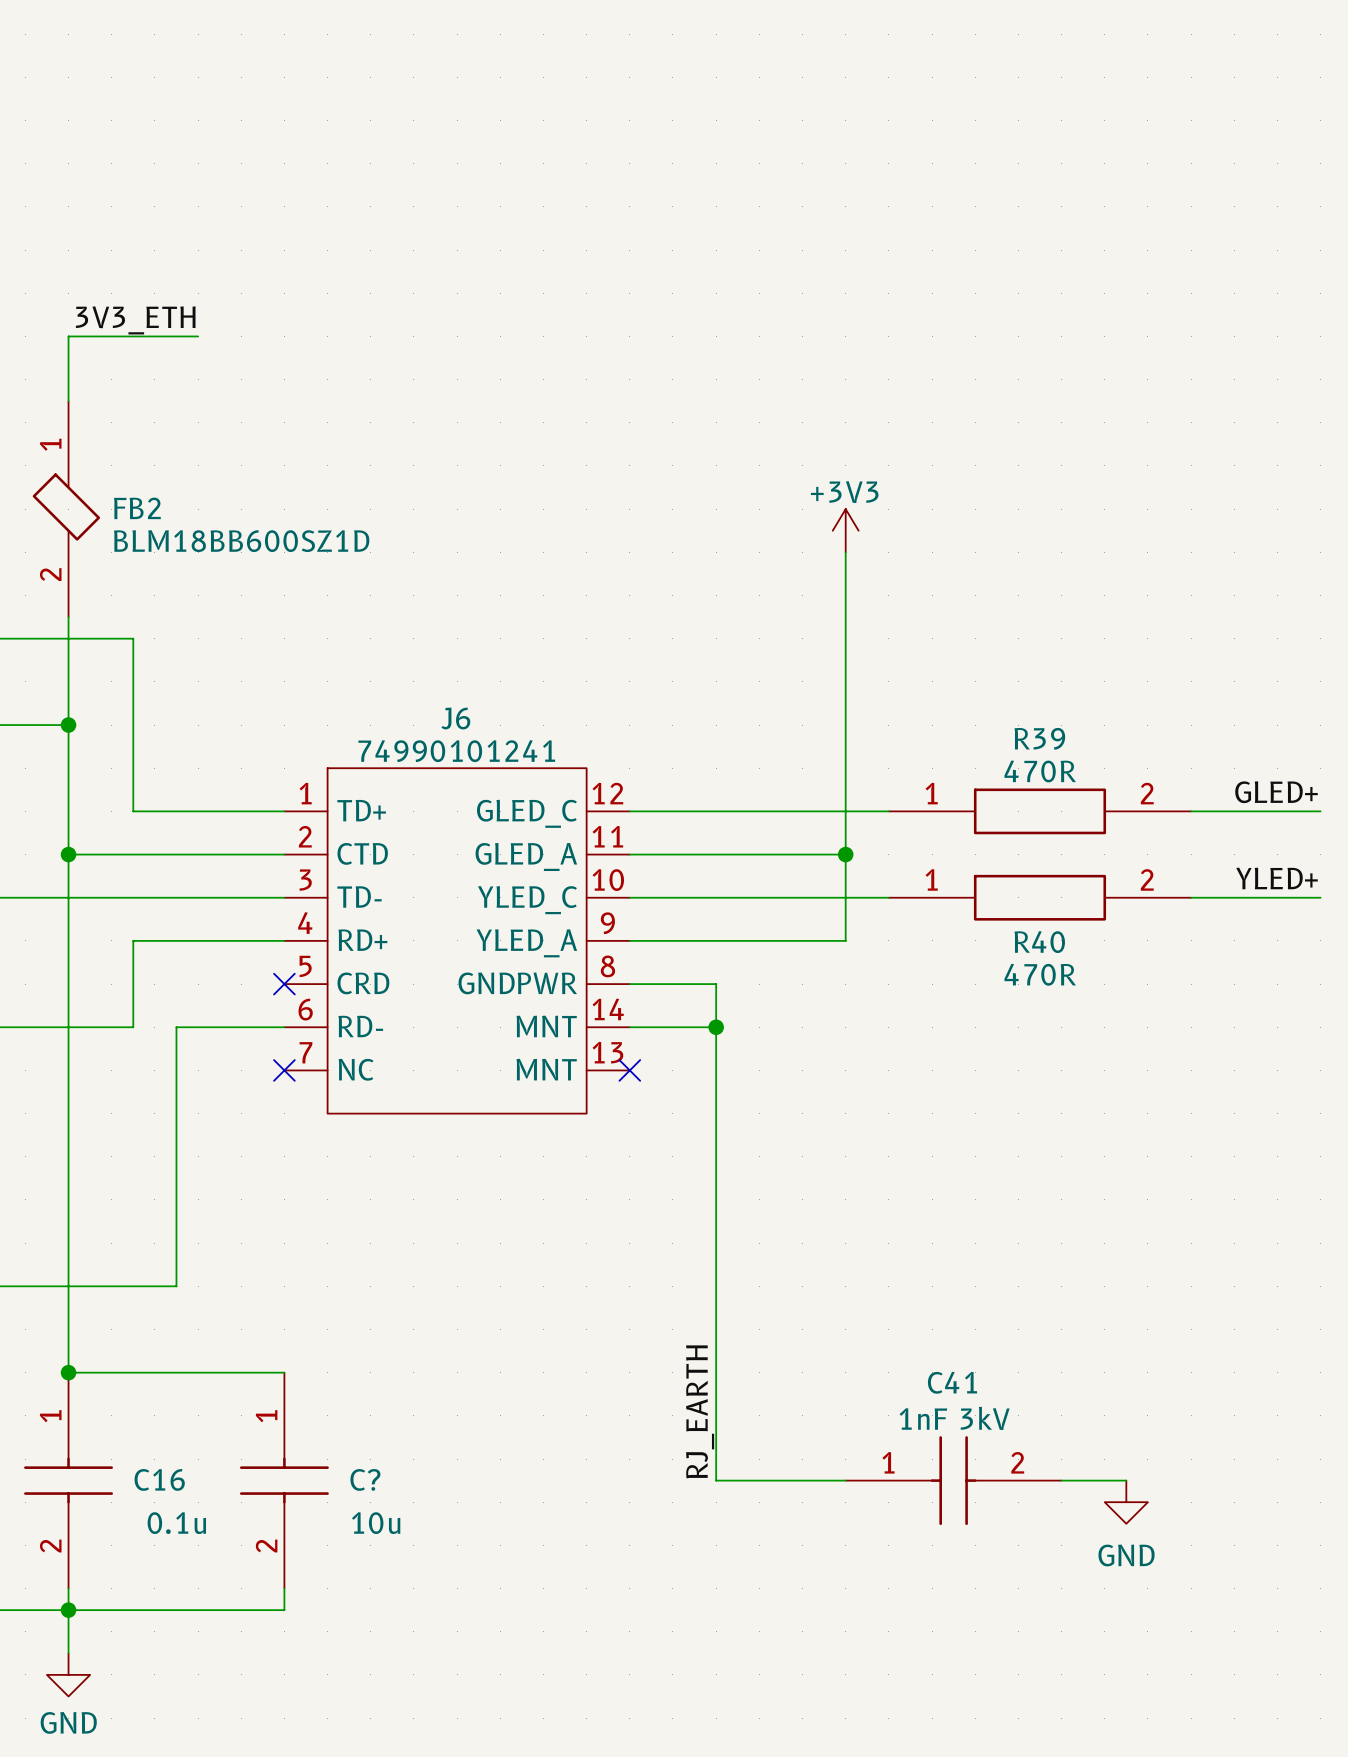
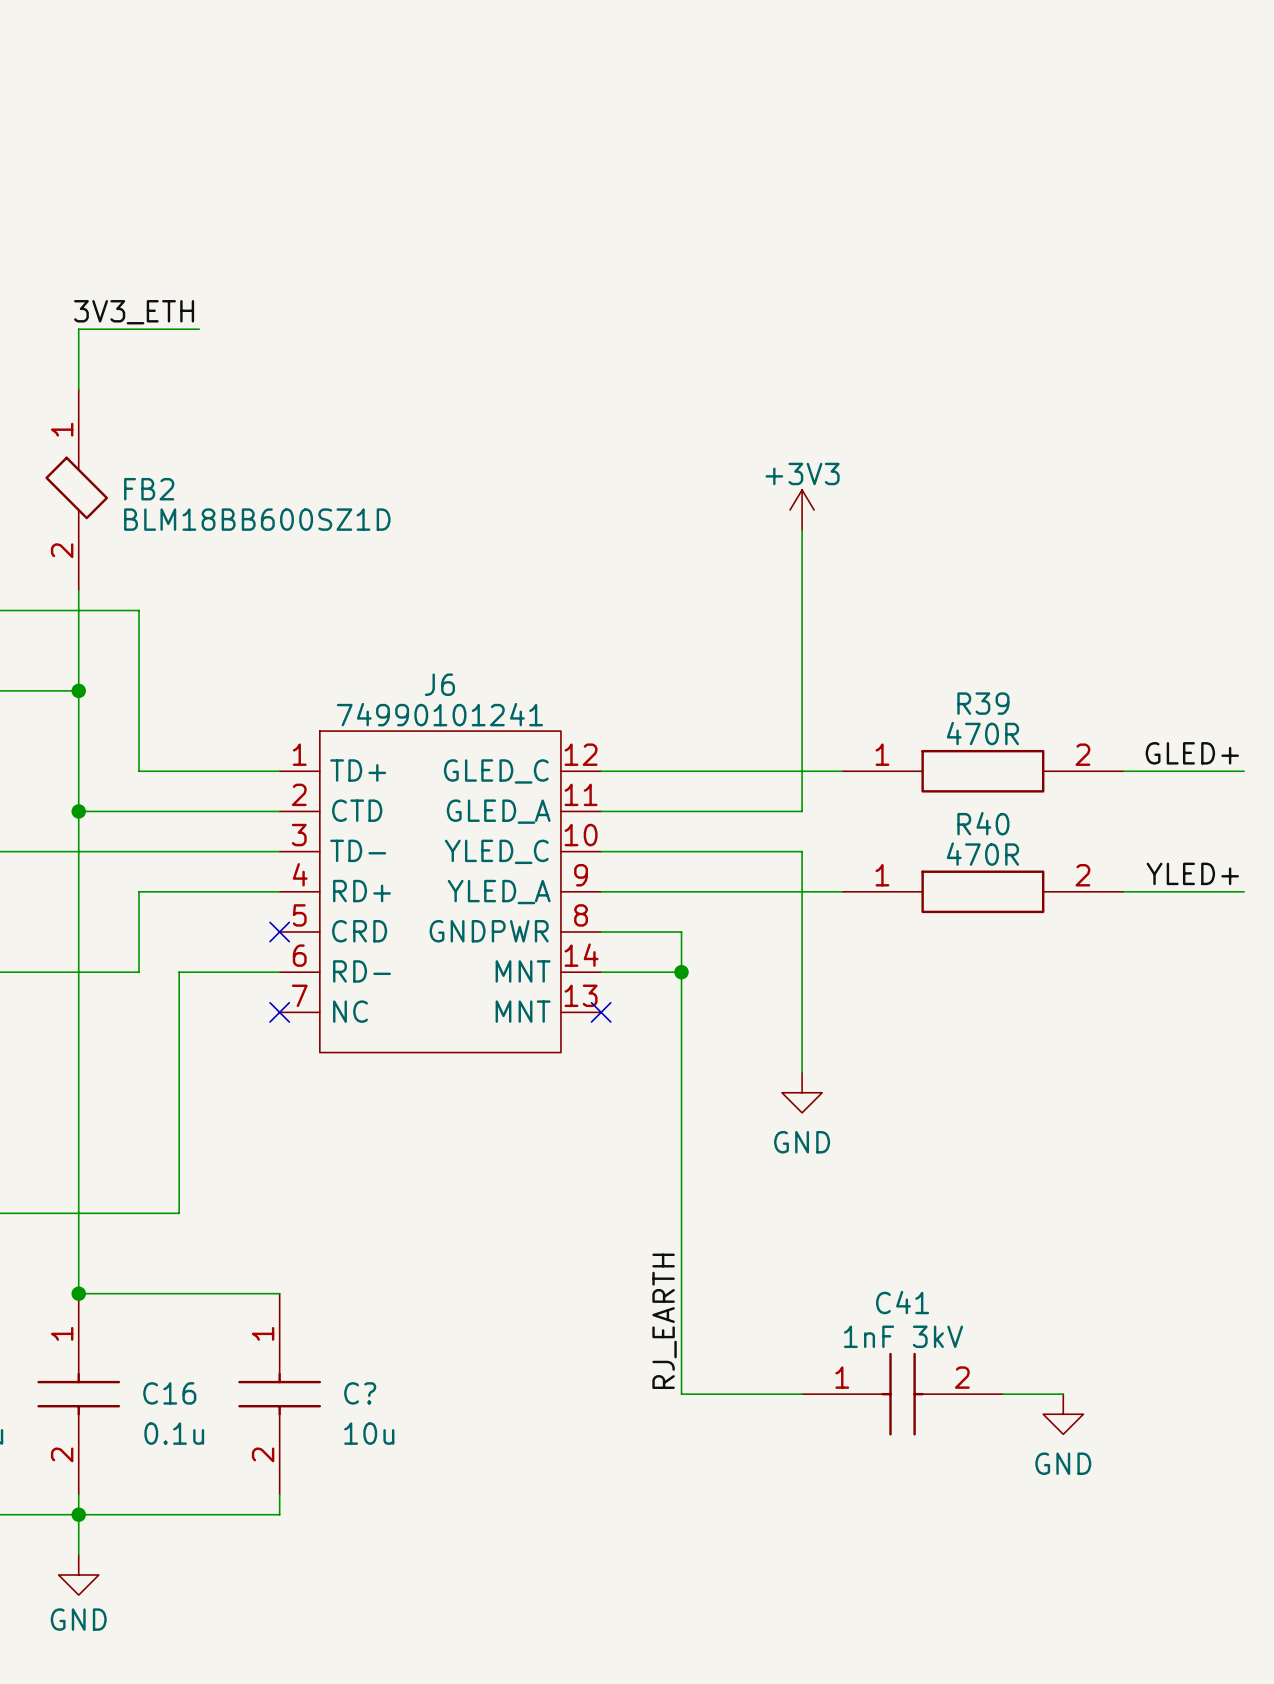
wire: (845, 854) (845, 897) (888, 897) -> none
junction: (845, 854) -> none
label position: YLED+ (1277, 878) -> YLED+ (1192, 873)
R40 position: (1039, 897) -> (982, 891)
wire: (1191, 897) (1320, 897) -> (1123, 891) (1244, 891)
wire: none -> (842, 891) (802, 891) (802, 1072)
R40 name position: R40 (1039, 942) -> R40 (983, 823)
R40 value position: 470R (1040, 974) -> 470R (982, 854)
power symbol: none -> GND (802, 1092)

